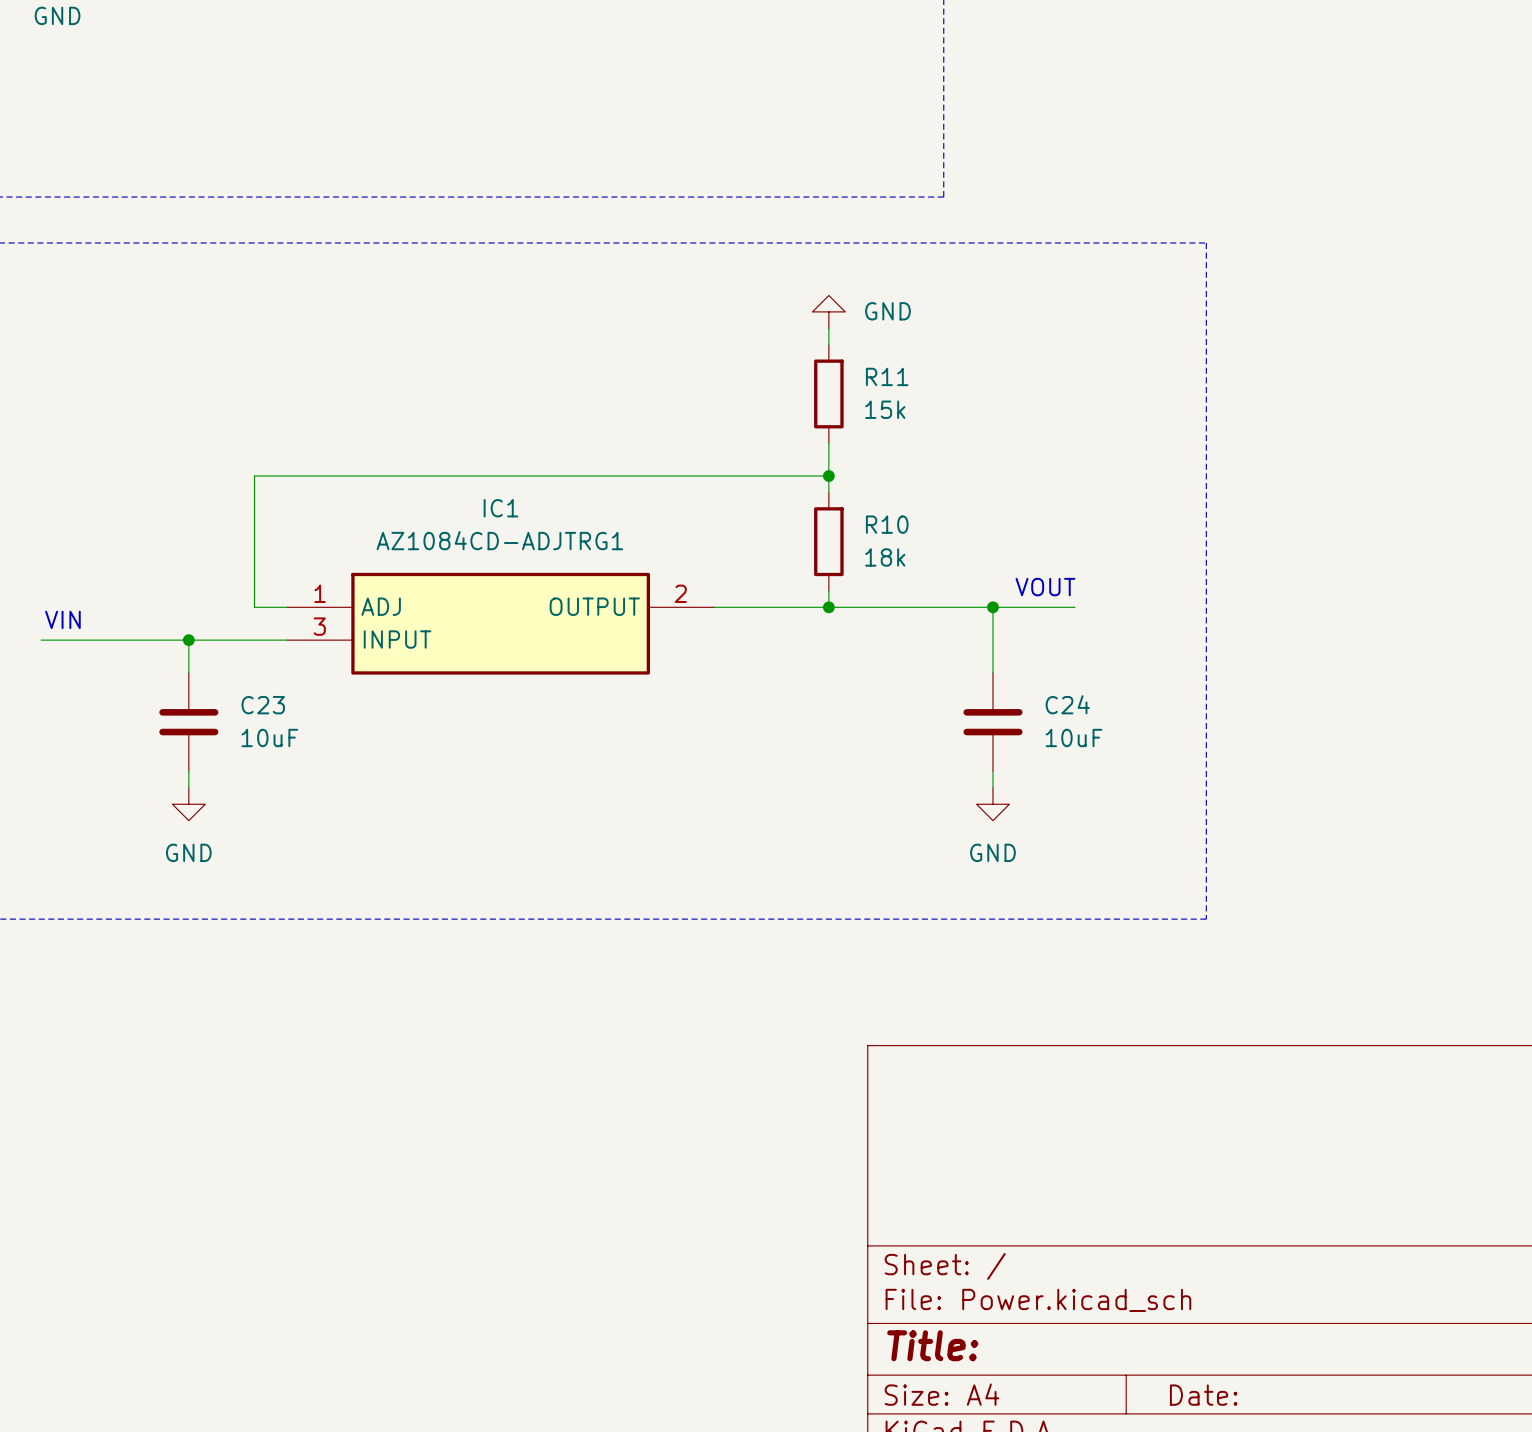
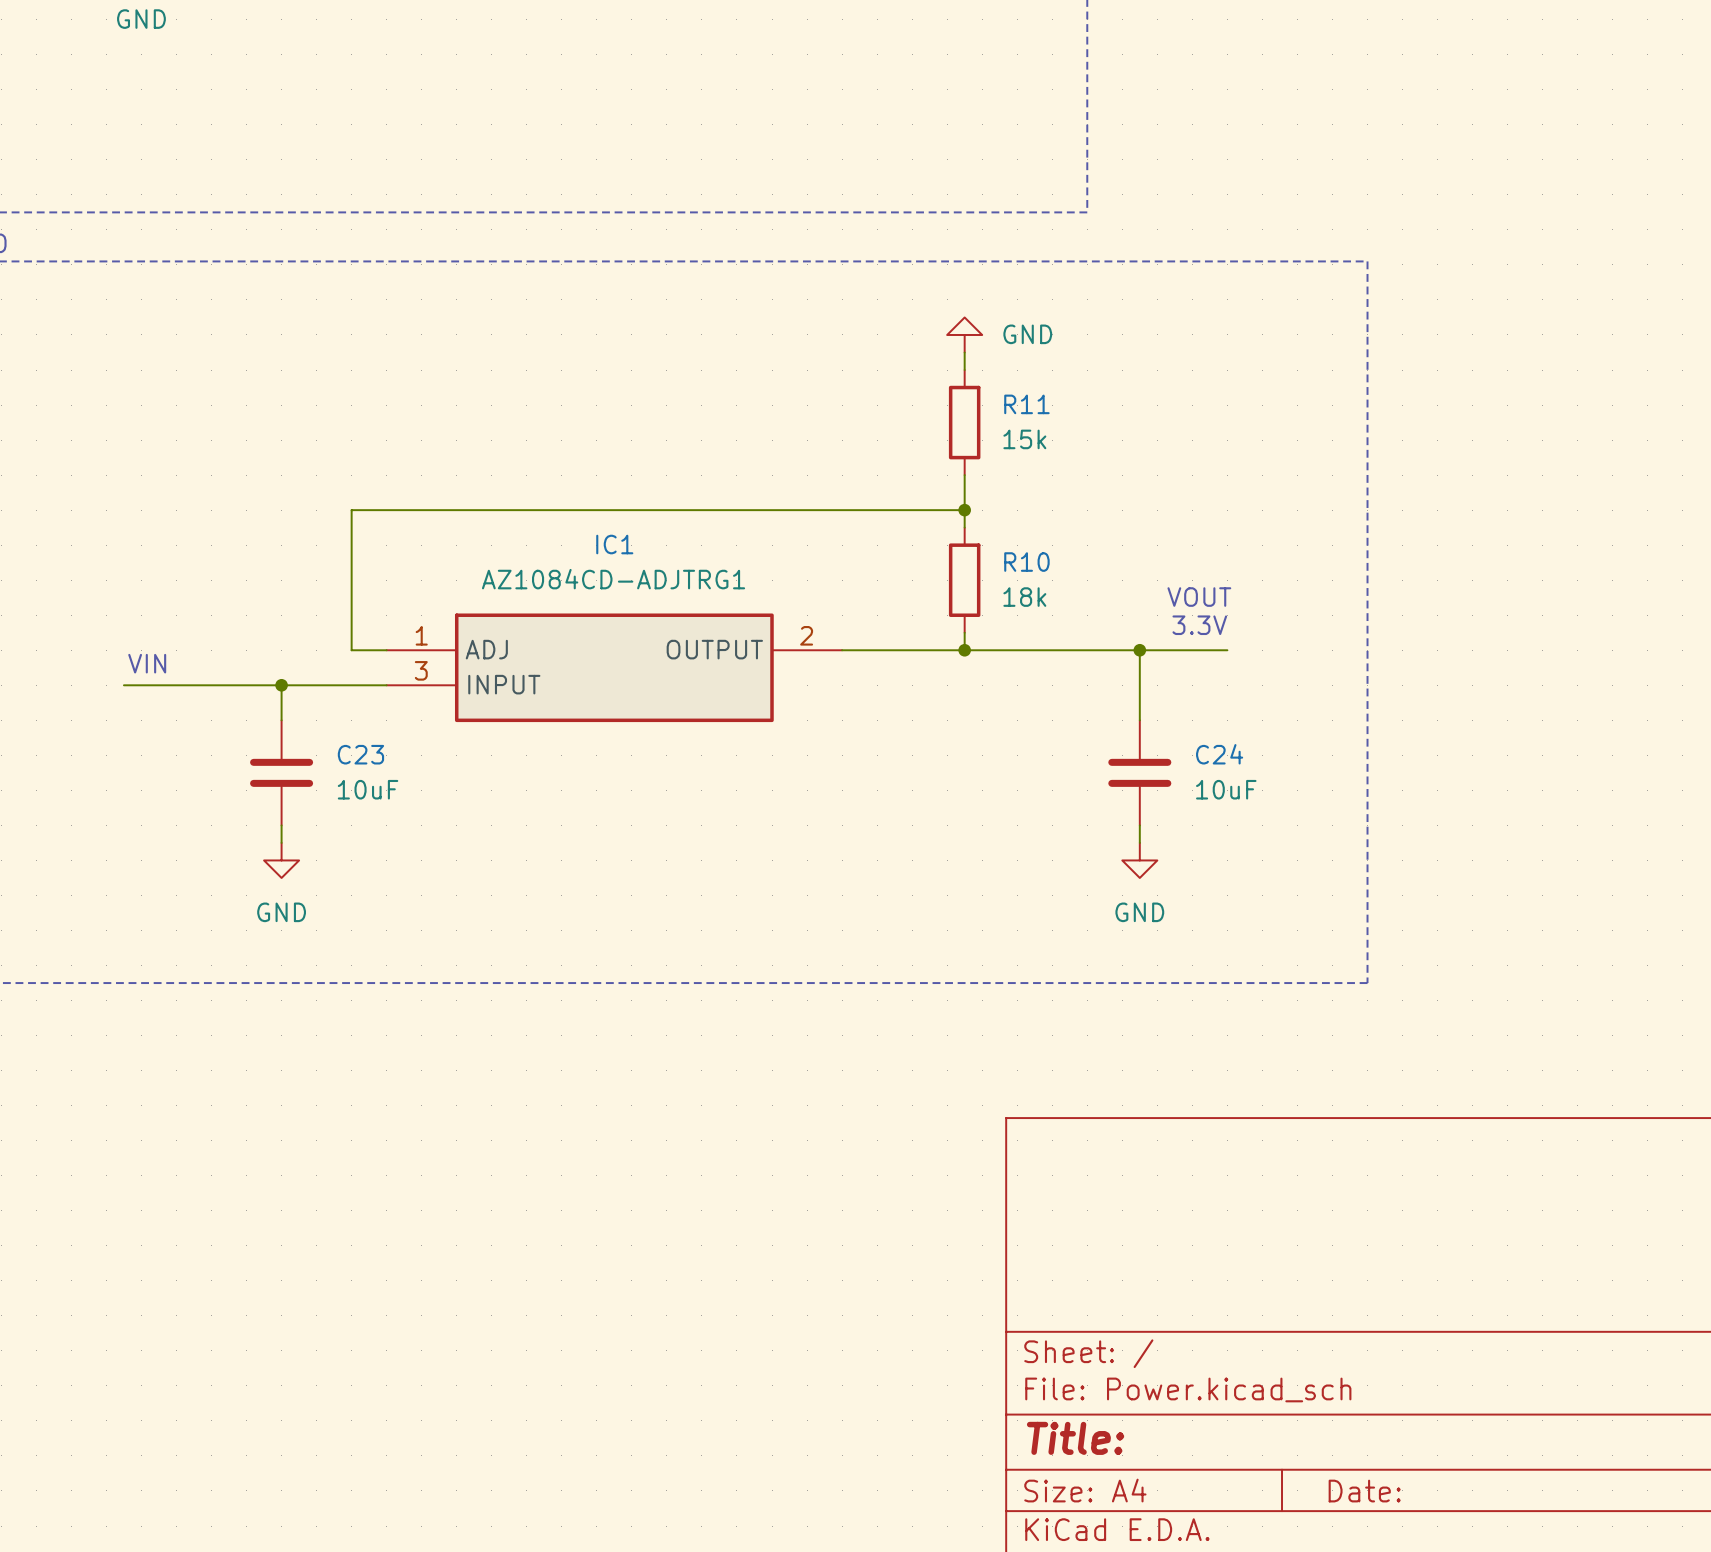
text: none -> VOUT (1199, 597)
text: VOUT (1045, 587) -> 3.3V (1199, 625)

